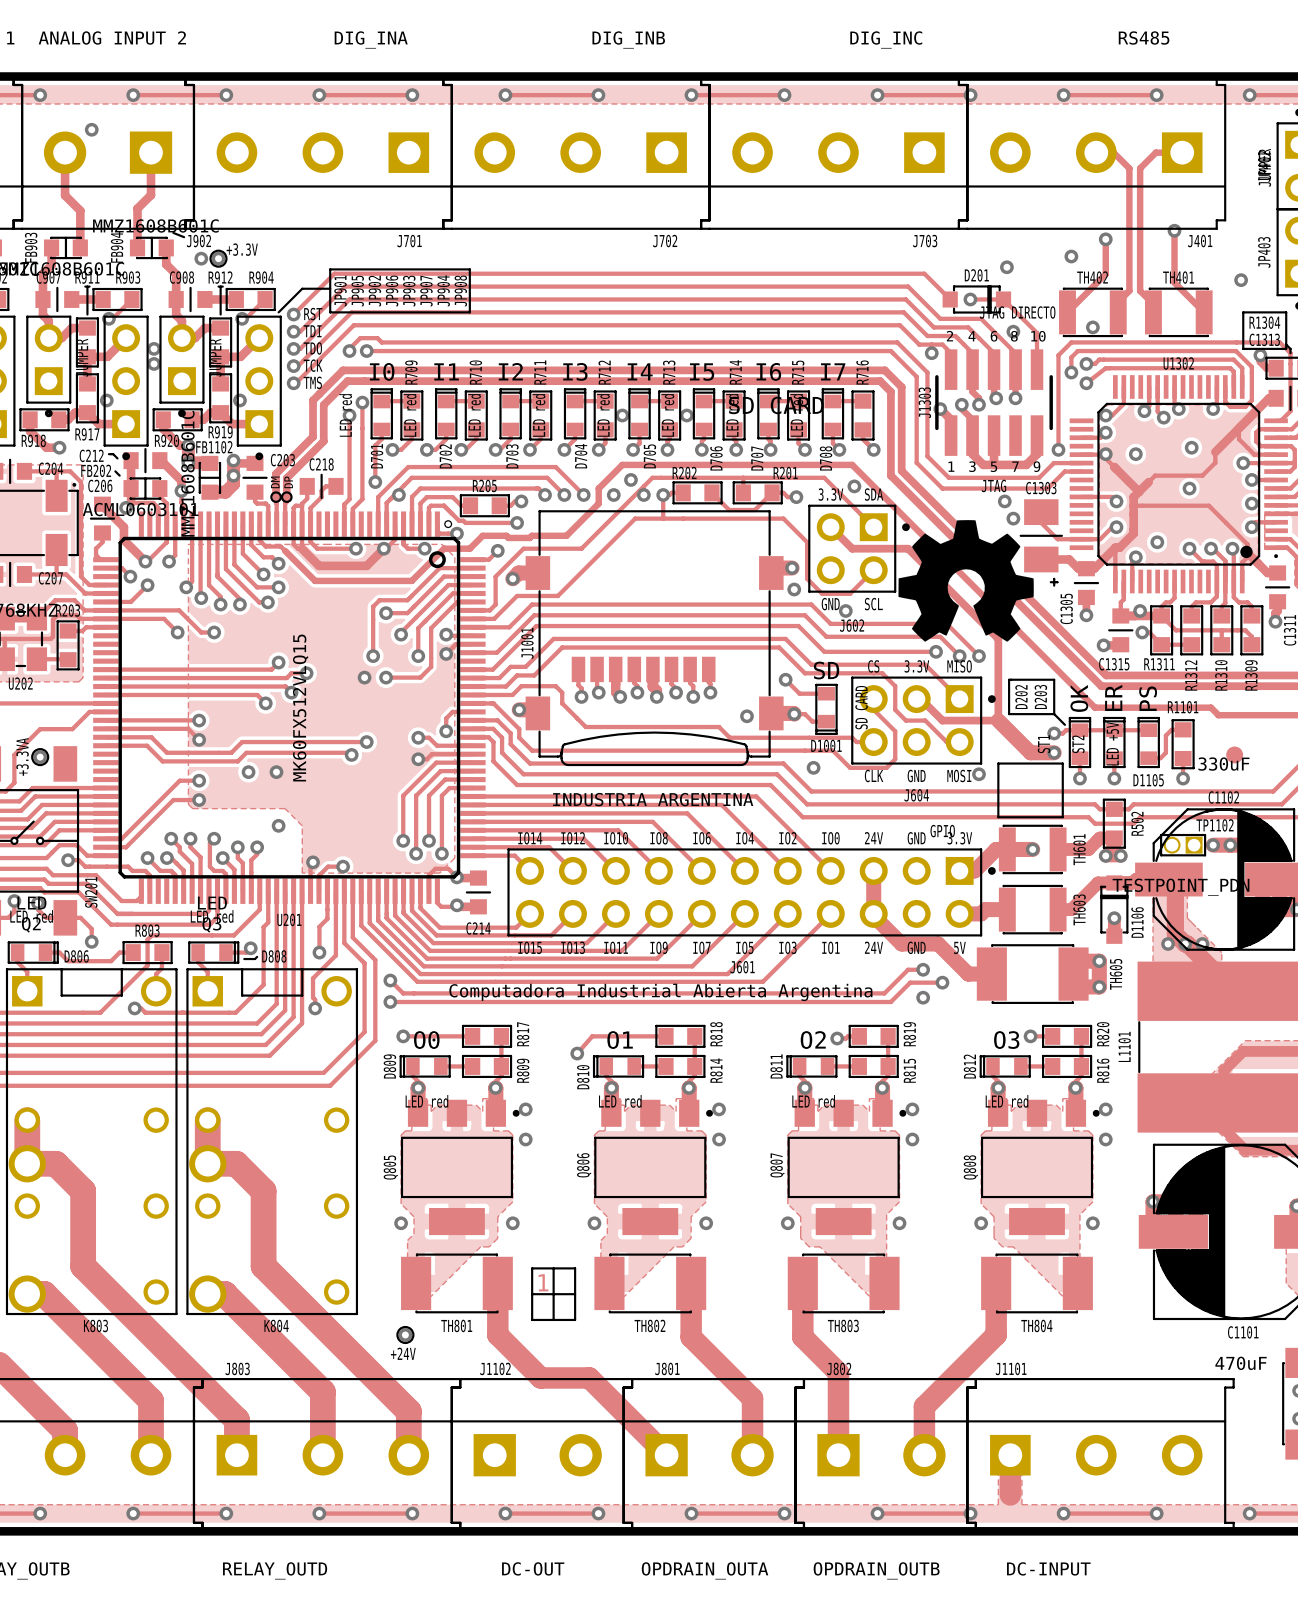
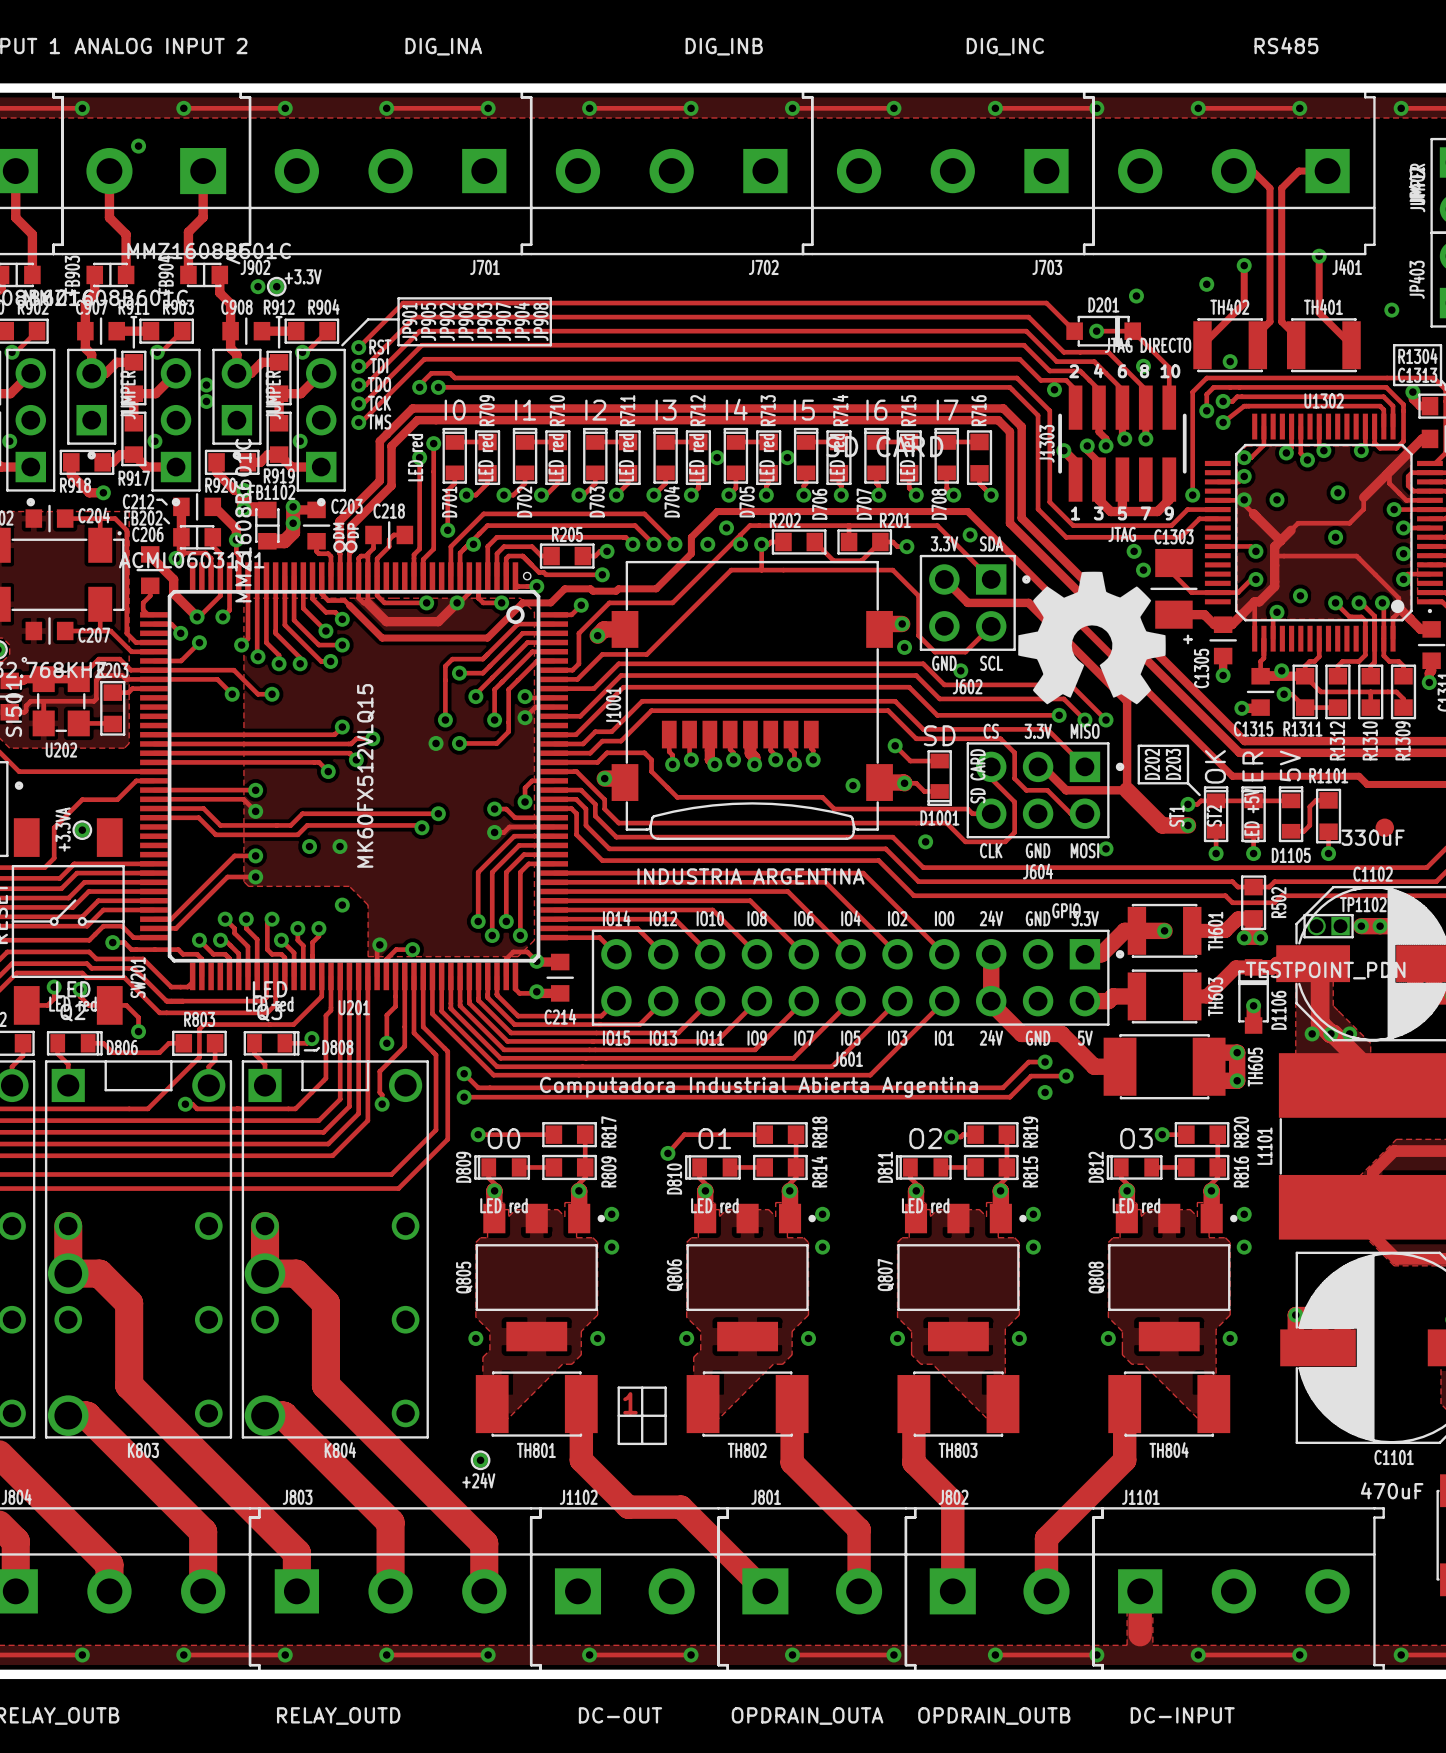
text: PS (1148, 698) -> 5V (1290, 765)
line: (998, 763) (998, 817) (1062, 817) (1062, 763) (998, 763) -> none

